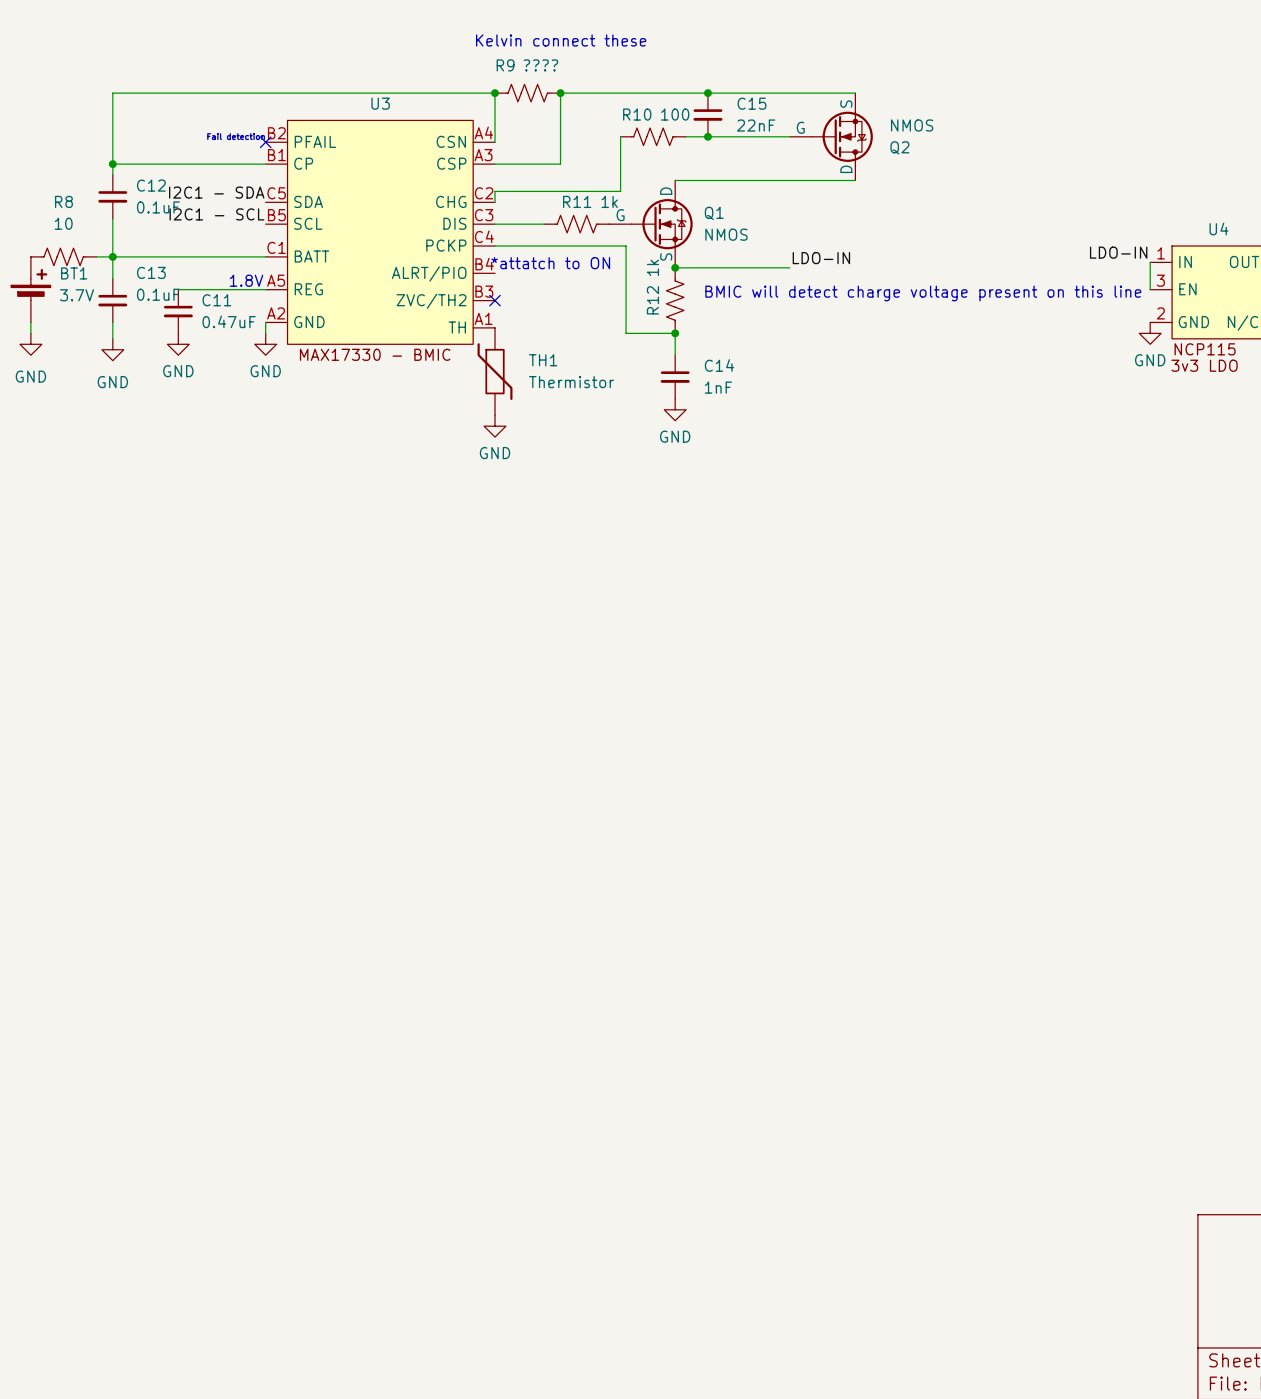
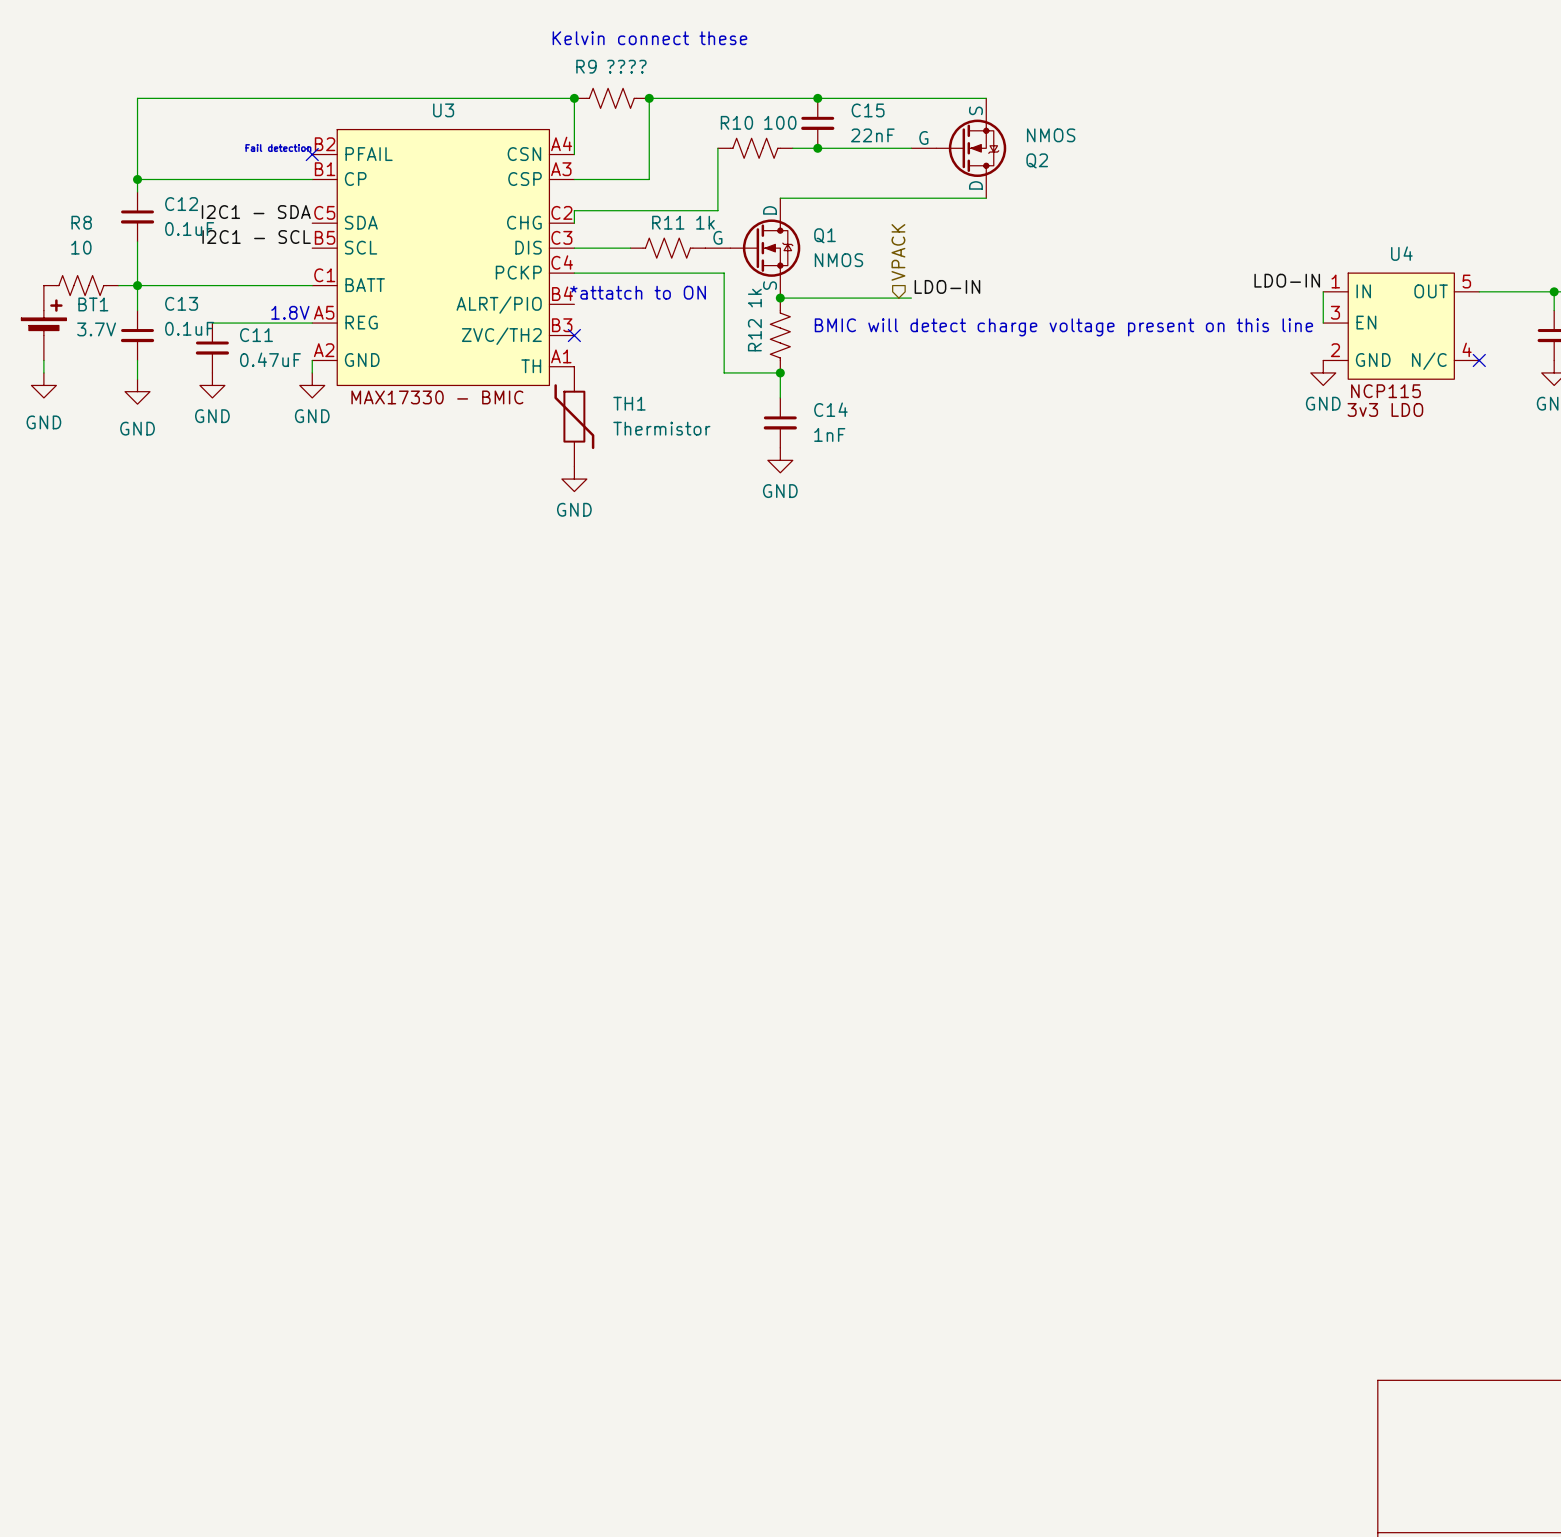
hierarchical label: none -> VPACK (898, 252)

